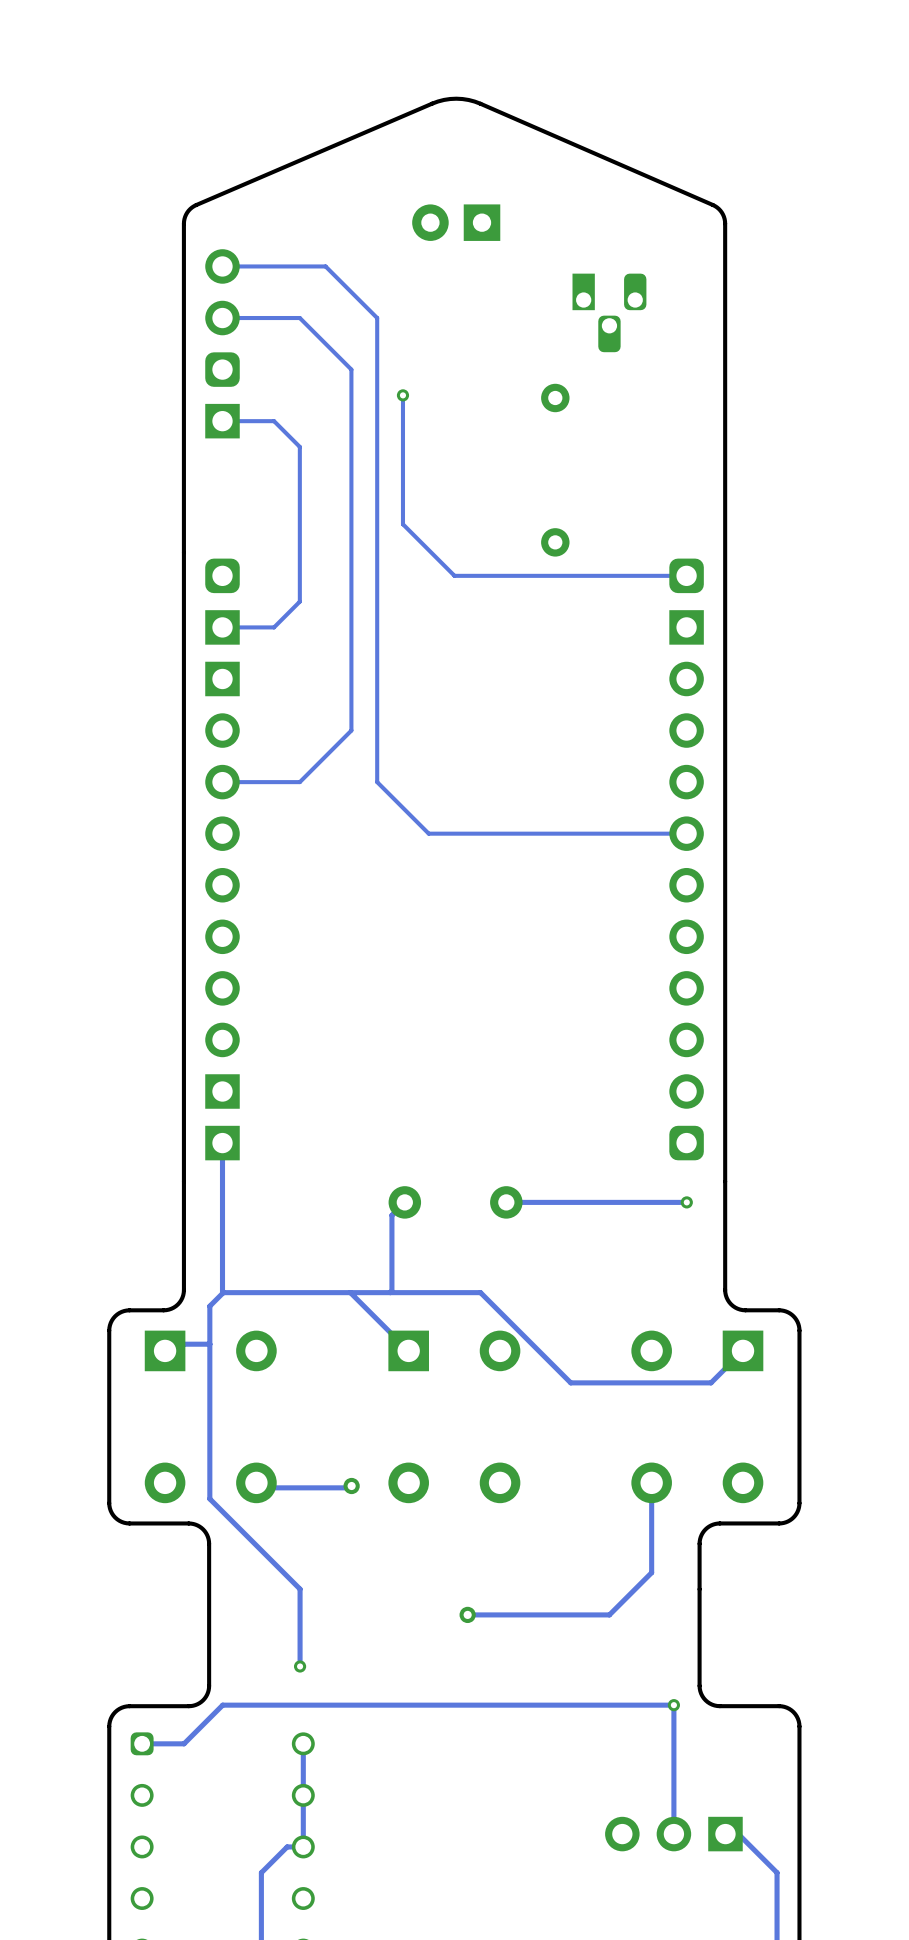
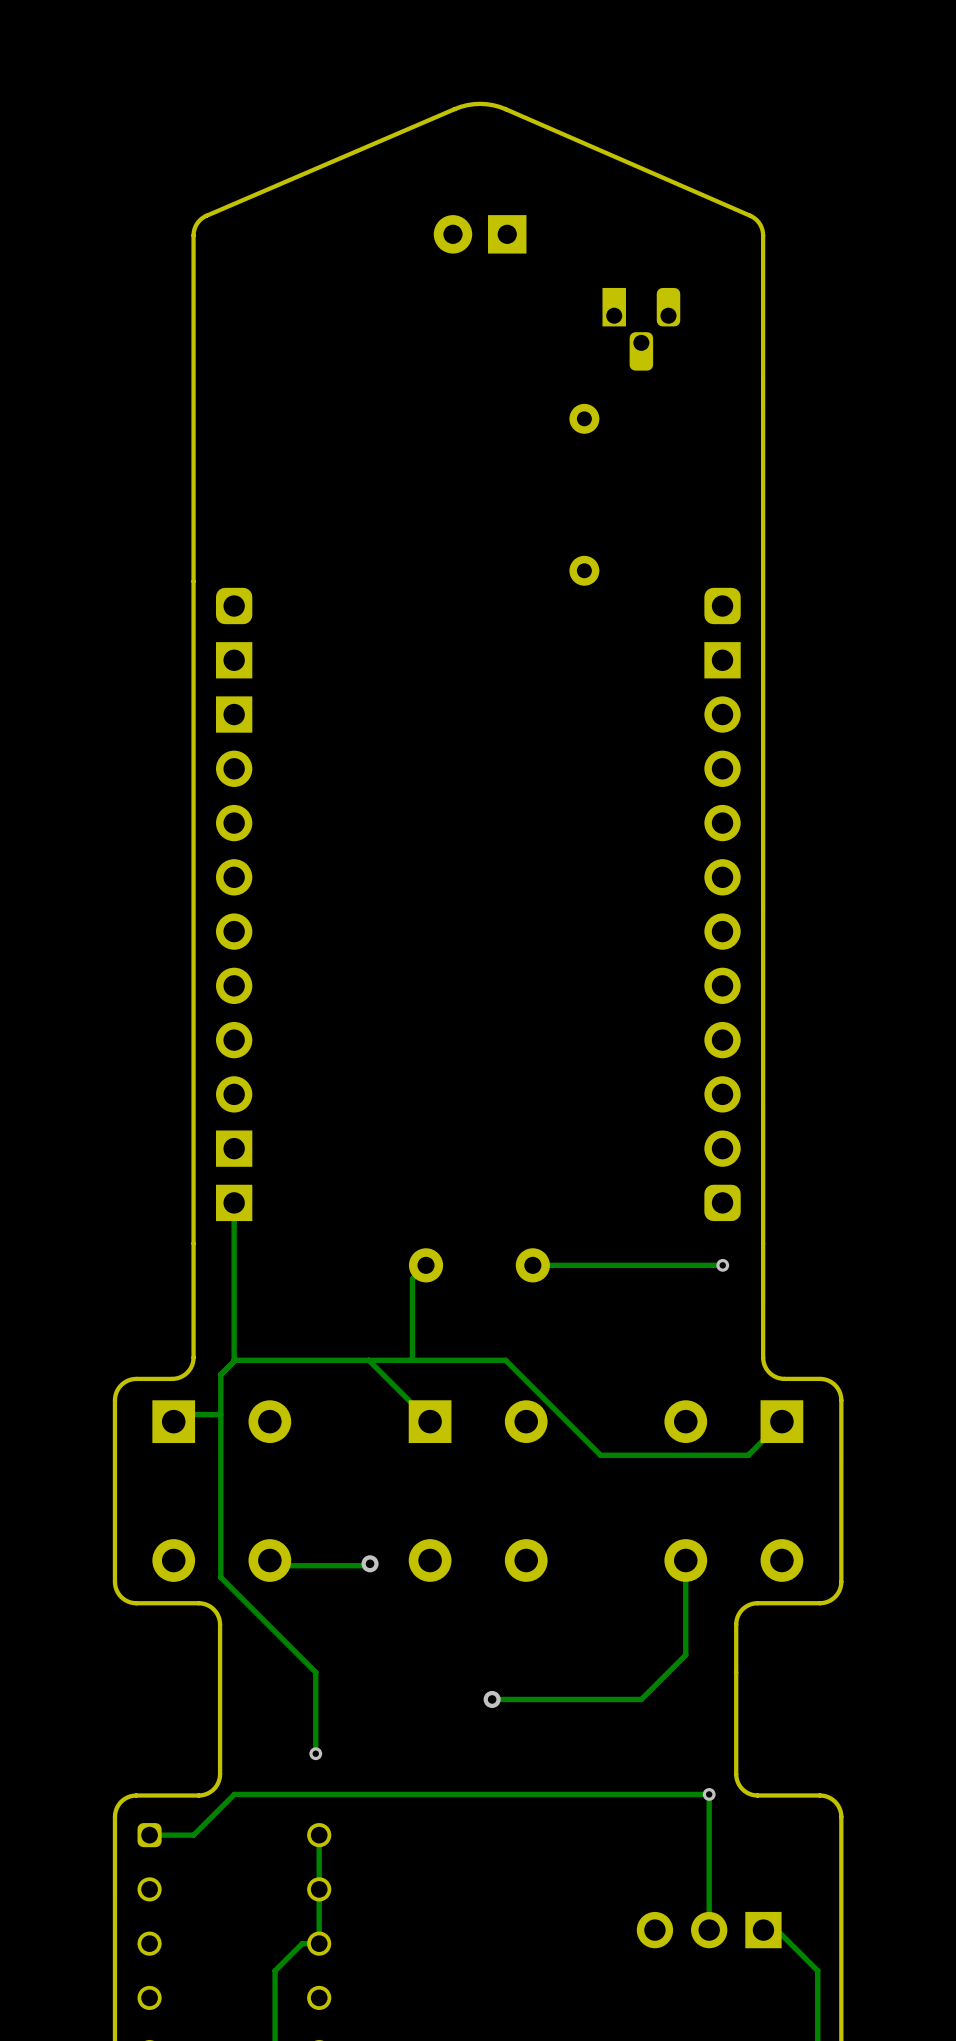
track: (222, 266) (325, 266) (377, 318) (377, 782) (428, 833) (686, 833) -> none
track: (222, 318) (299, 318) (351, 369) (351, 730) (299, 782) (222, 782) -> none
part: (222, 343) -> none
track: (402, 395) (402, 524) (454, 575) (686, 575) -> none
via: (402, 395) -> none
track: (222, 421) (274, 421) (299, 446) (299, 601) (274, 627) (222, 627) -> none

